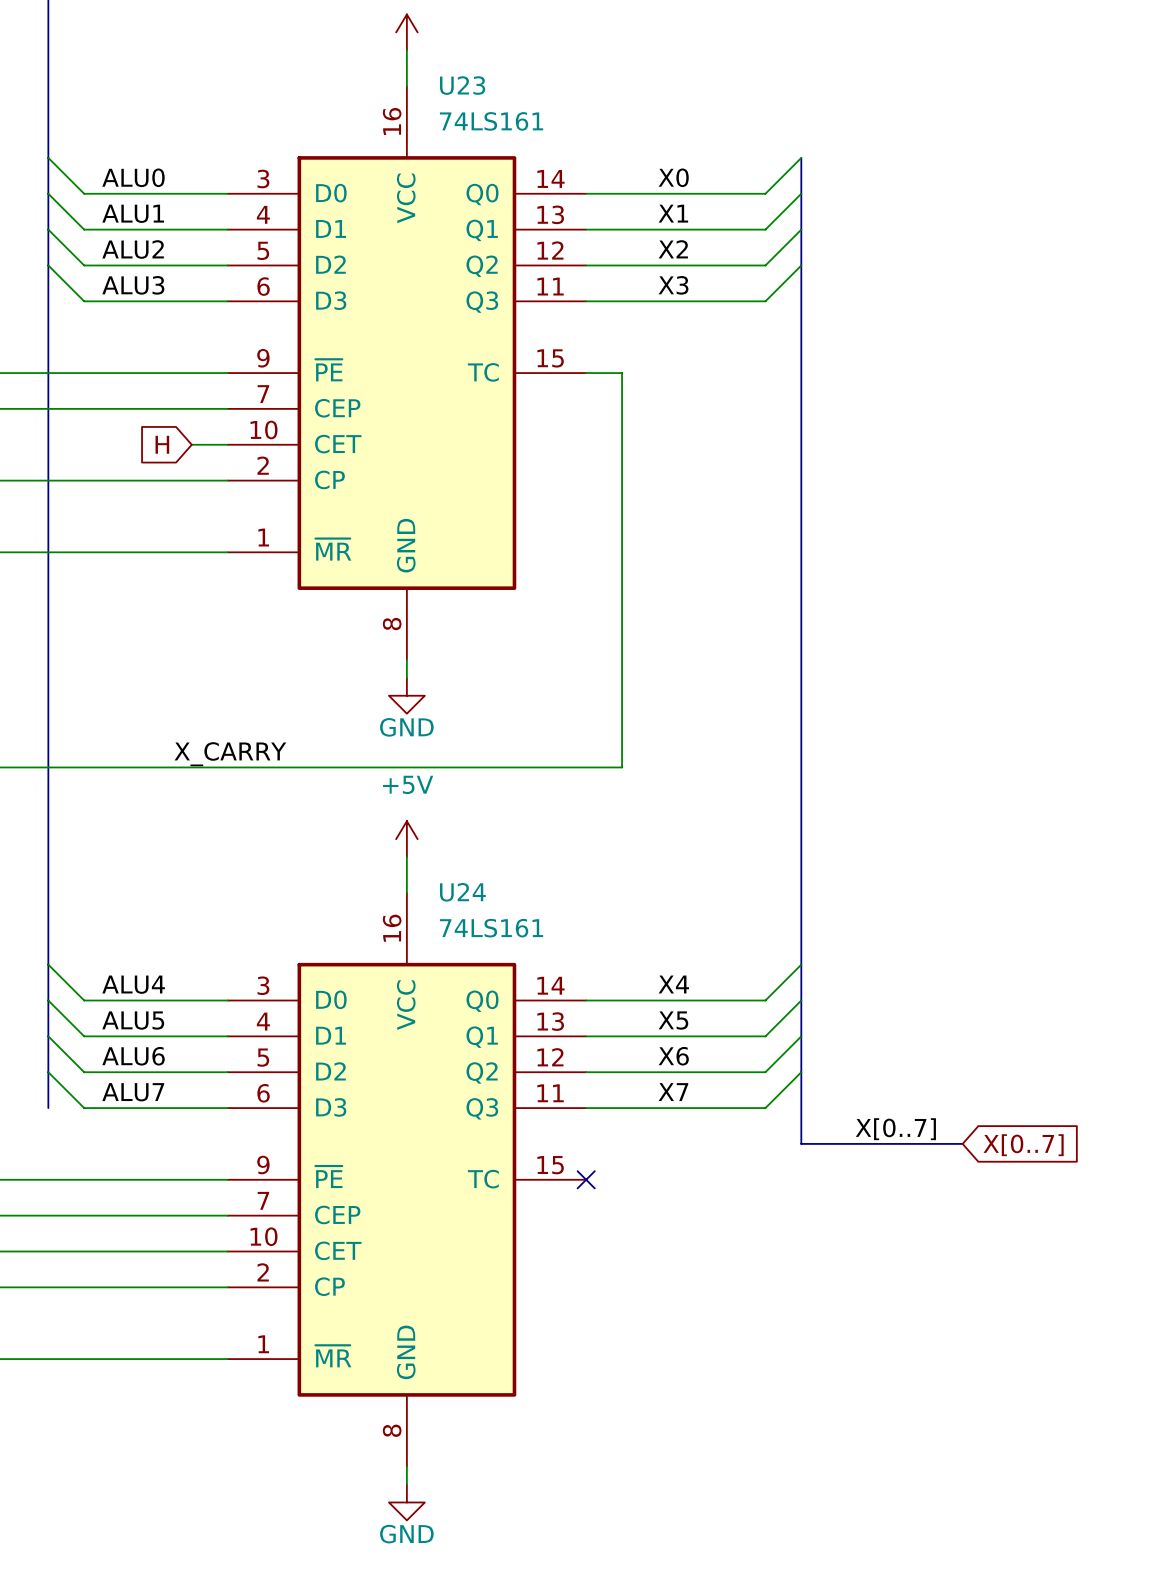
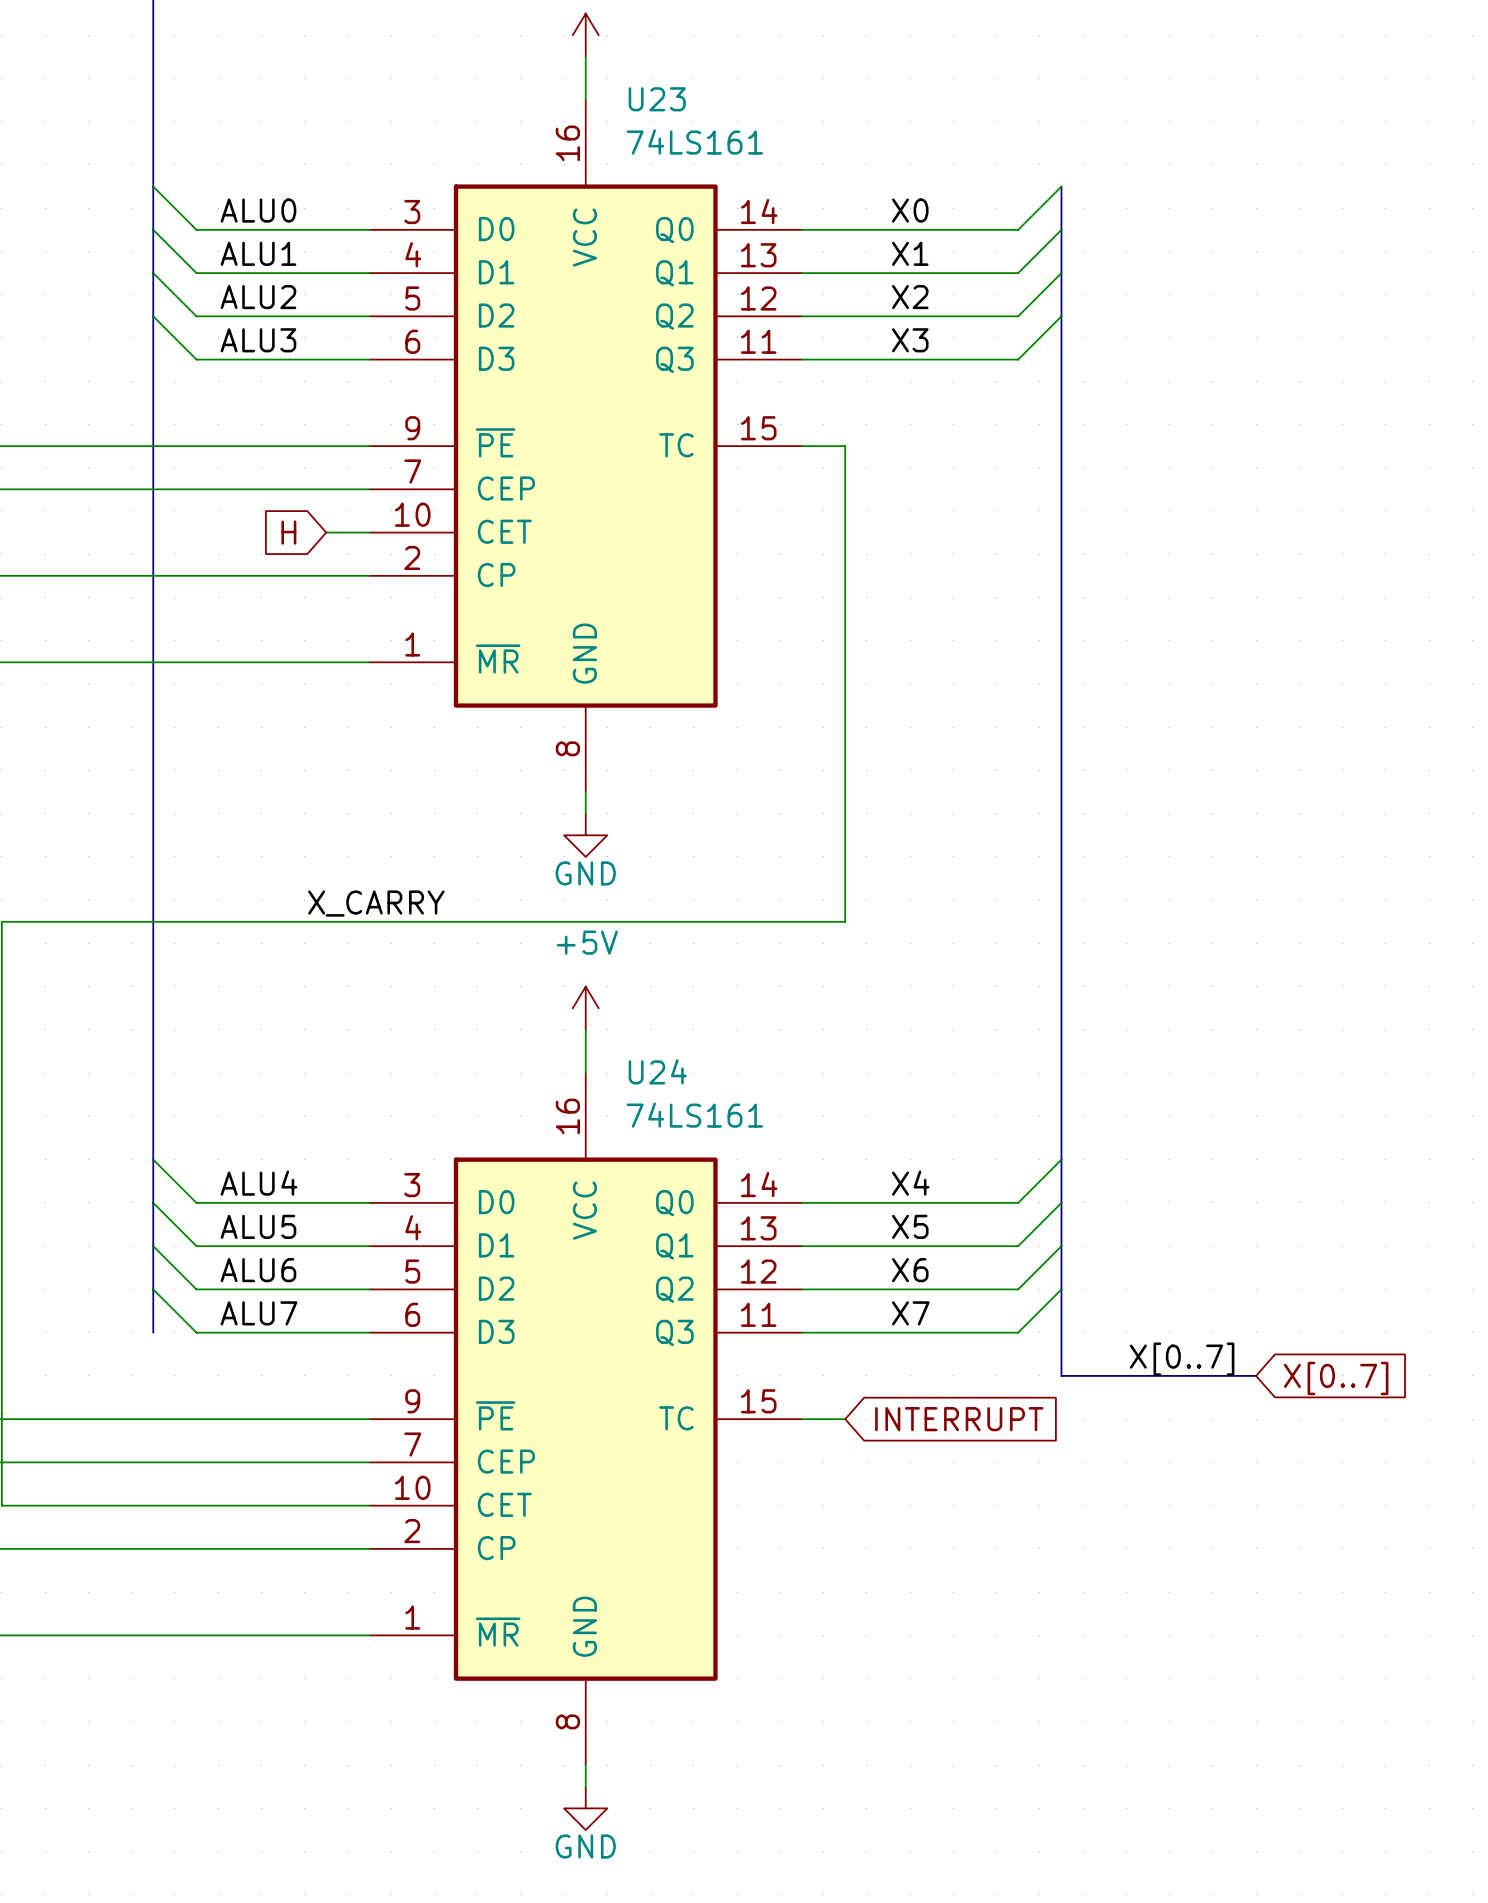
wire: none -> (801, 1419) (845, 1419)
no-connect mark: (586, 1179) -> none
global label: none -> INTERRUPT (959, 1419)

